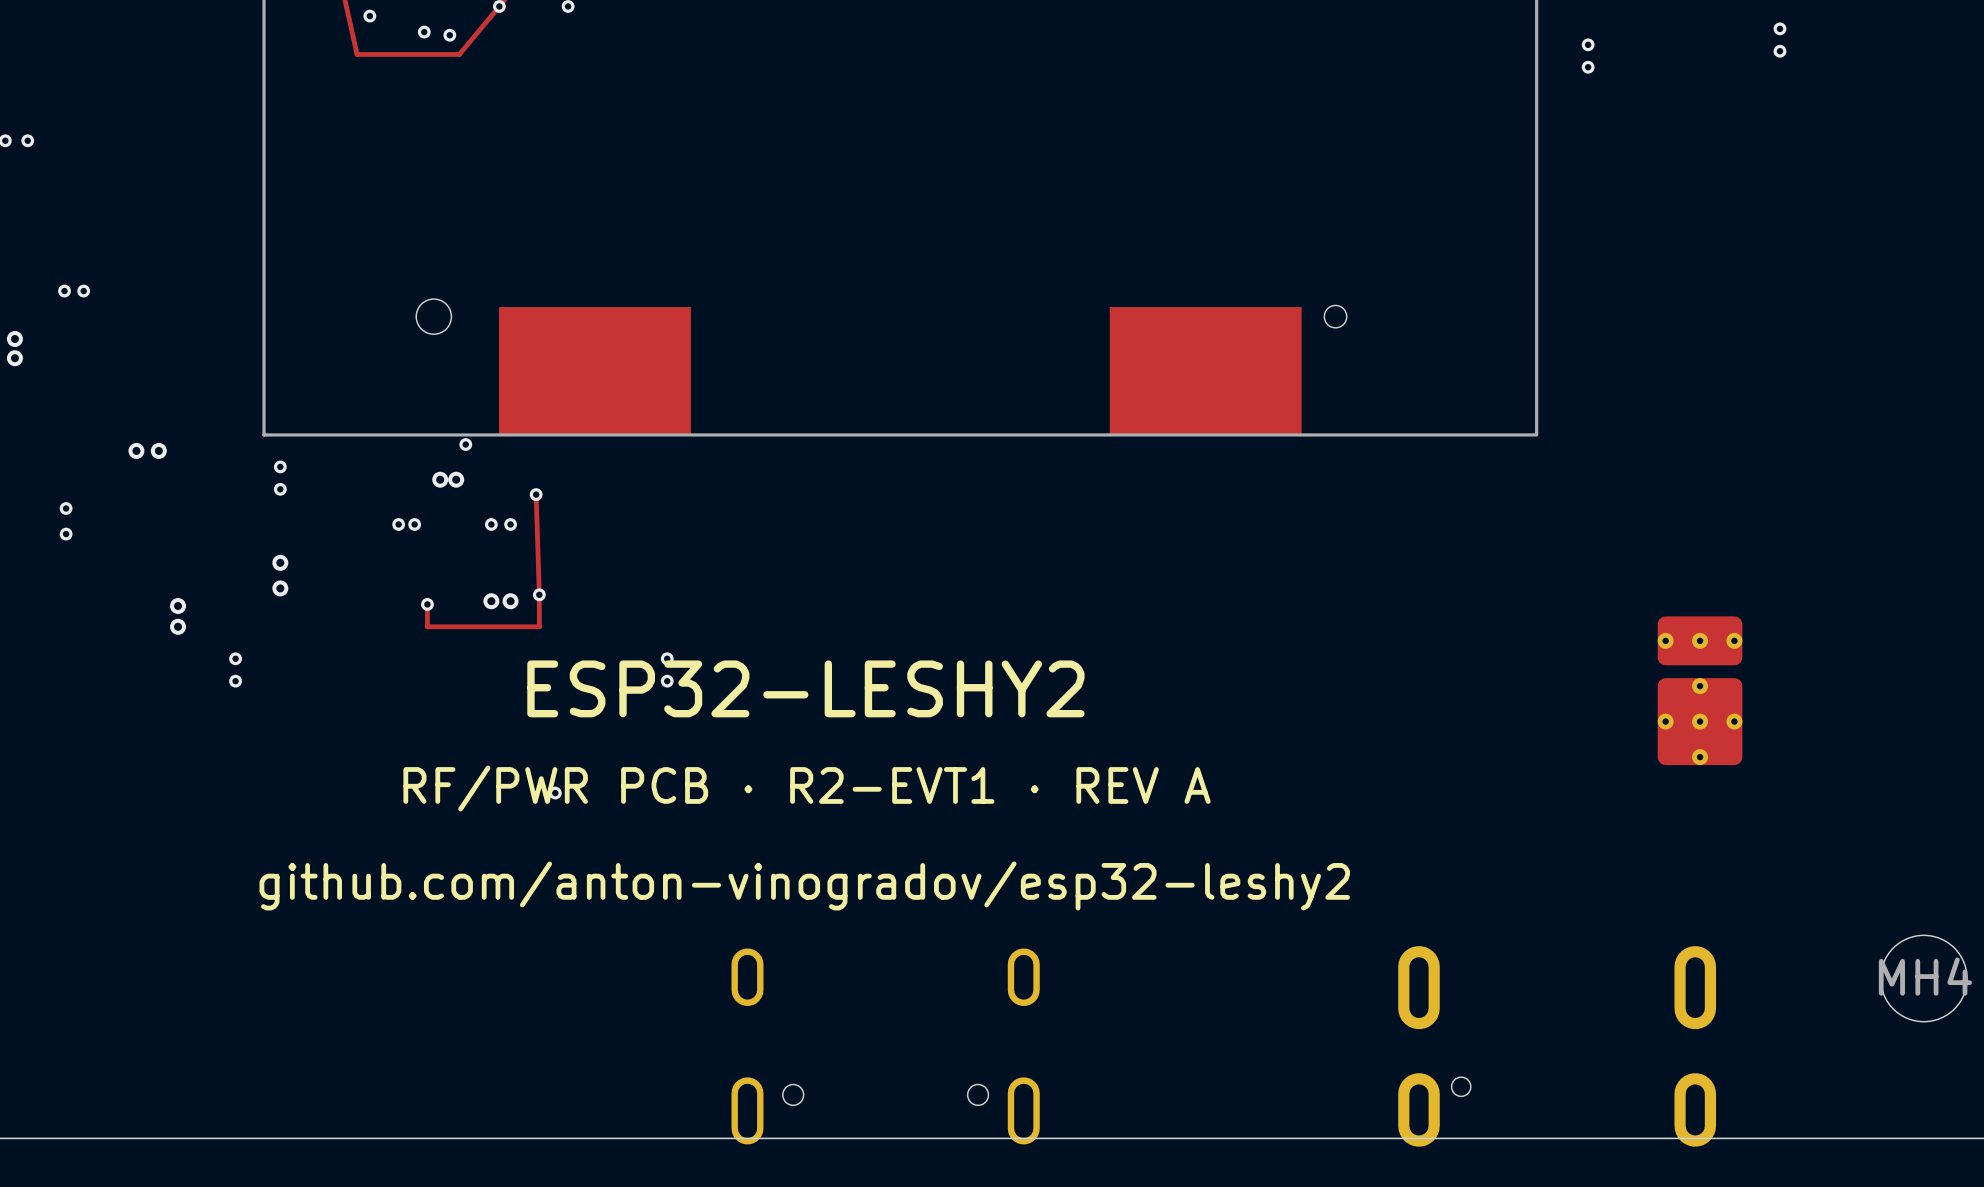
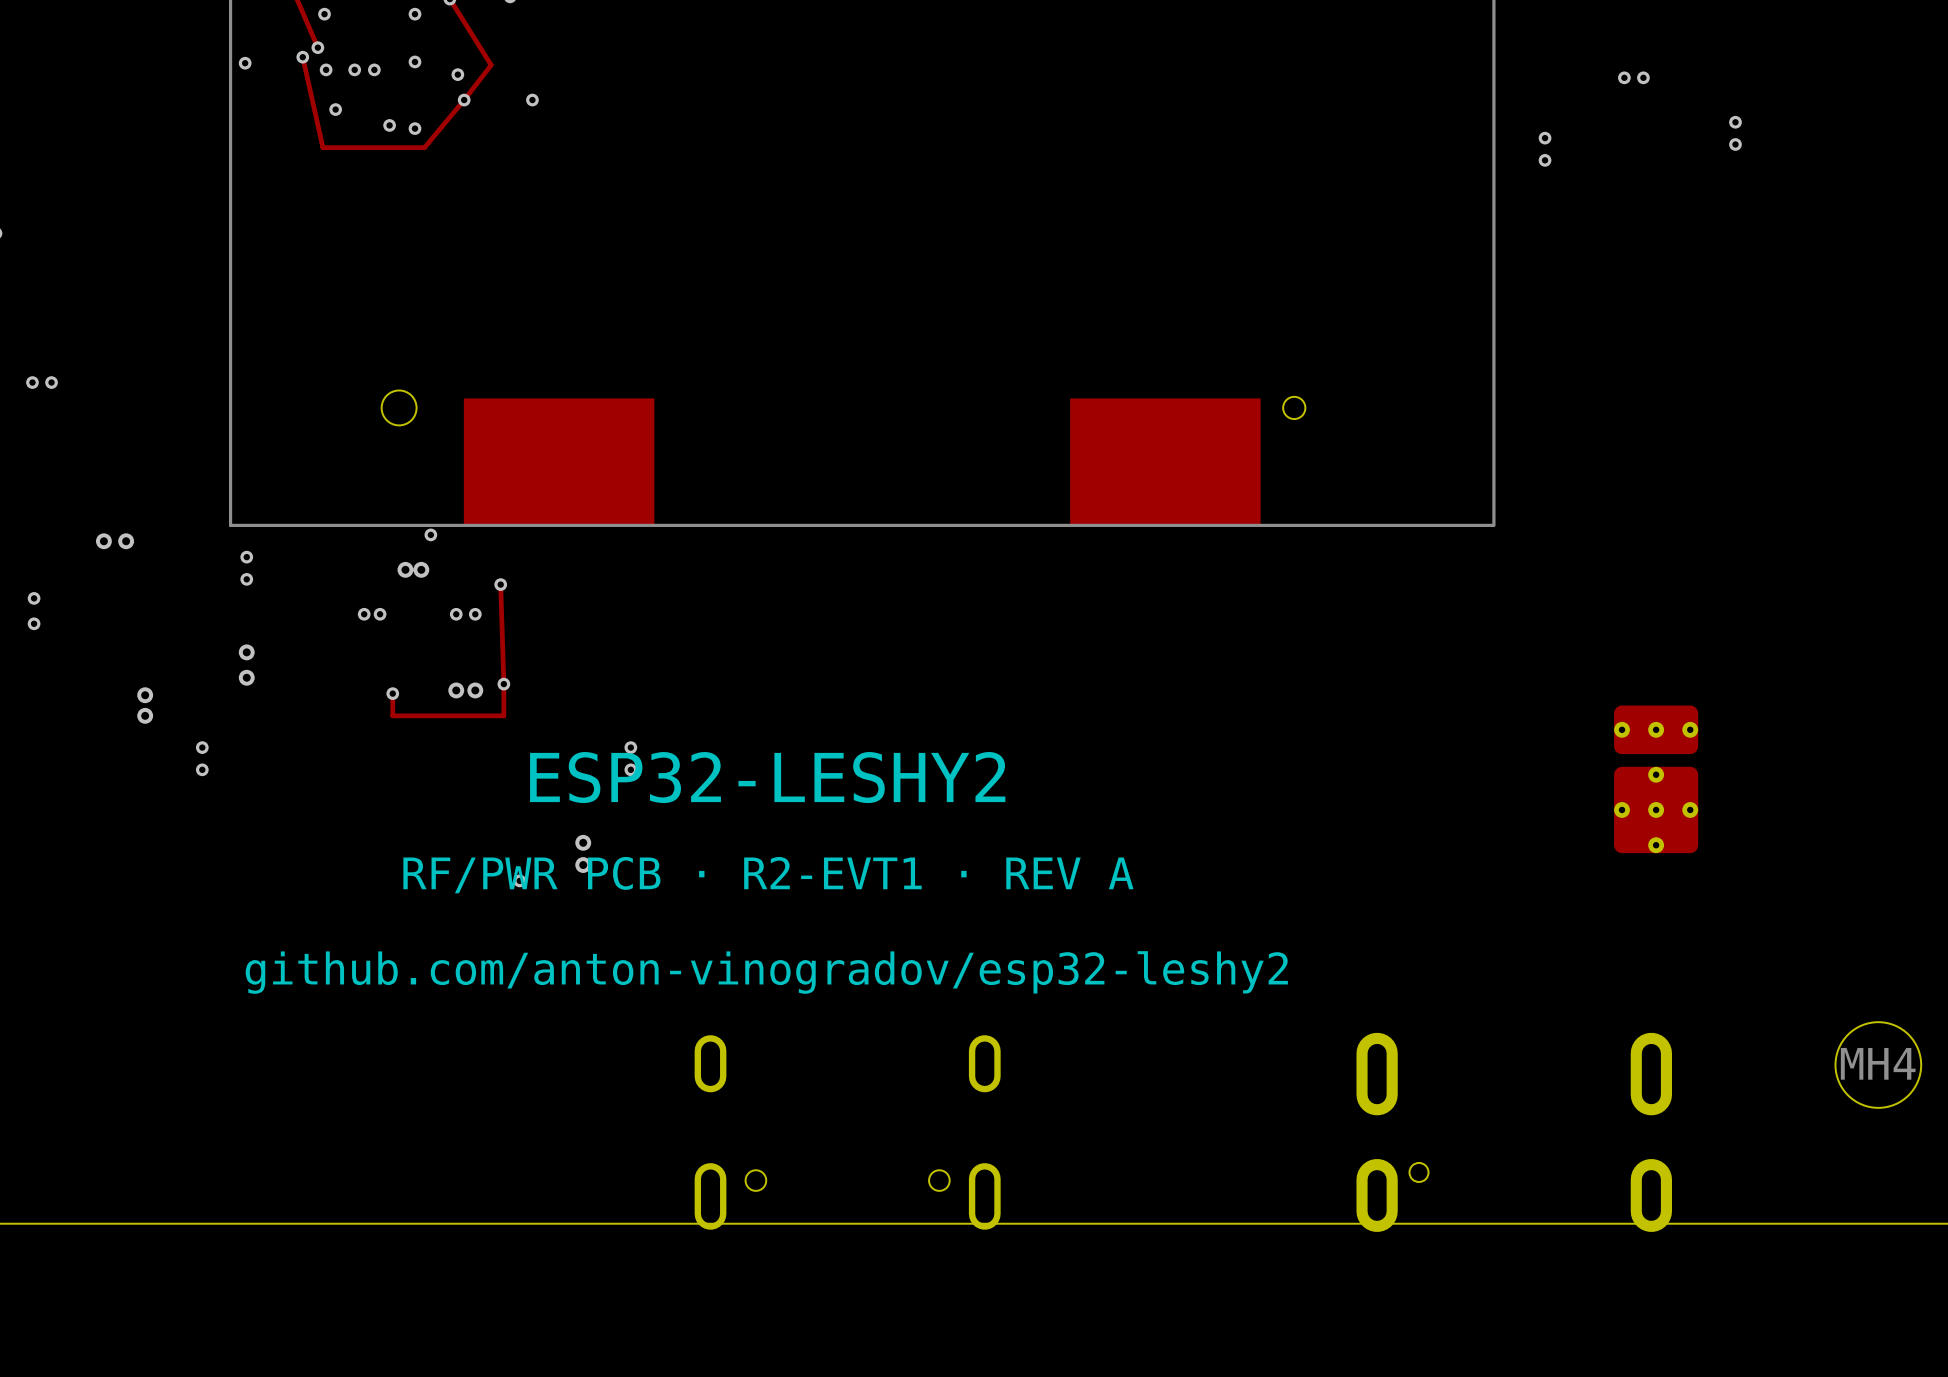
via: none -> (583, 842)
via: none -> (583, 865)

